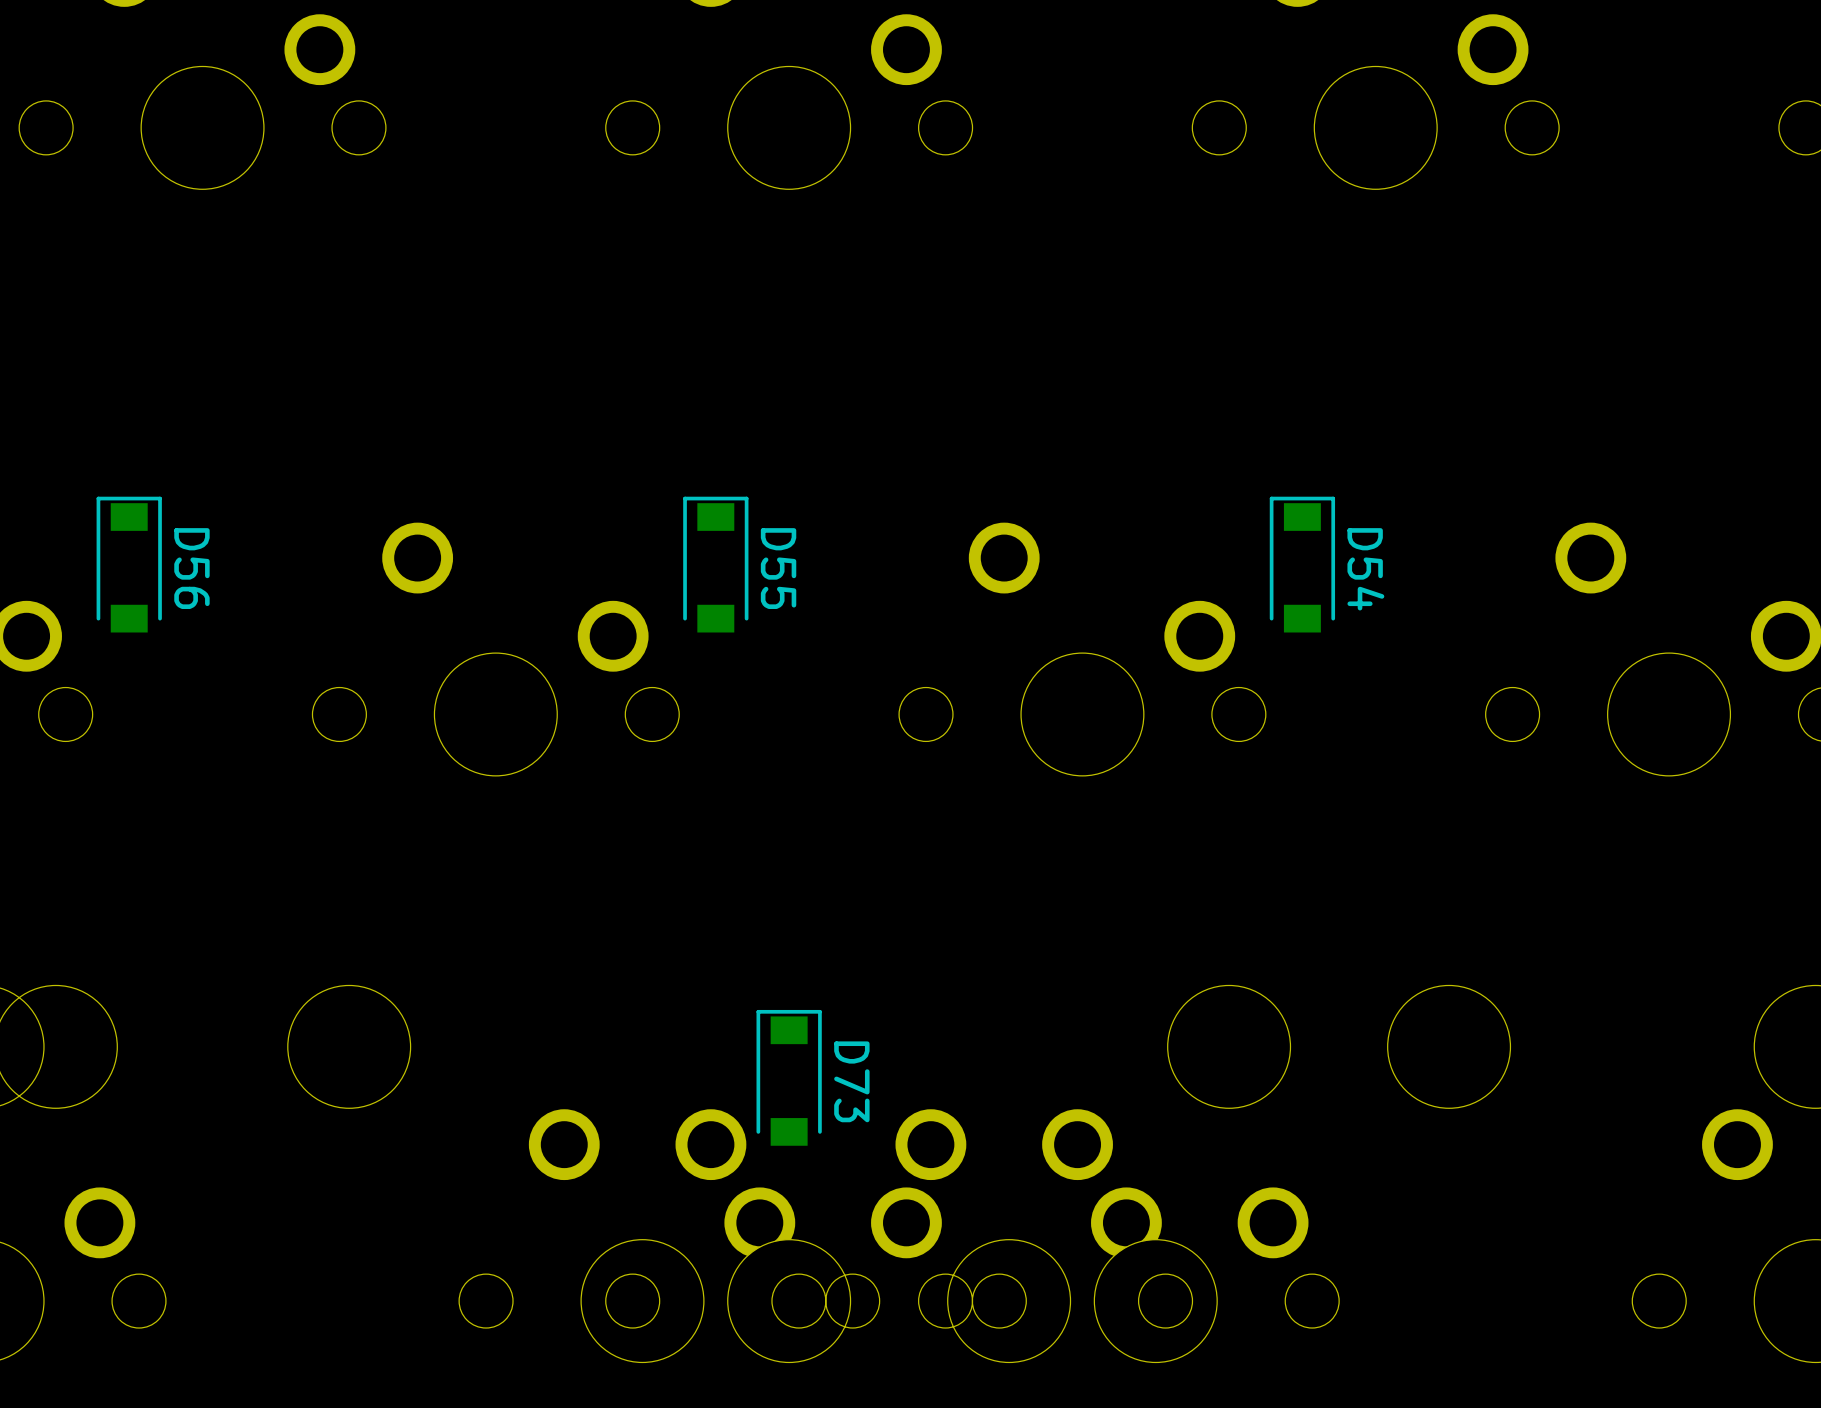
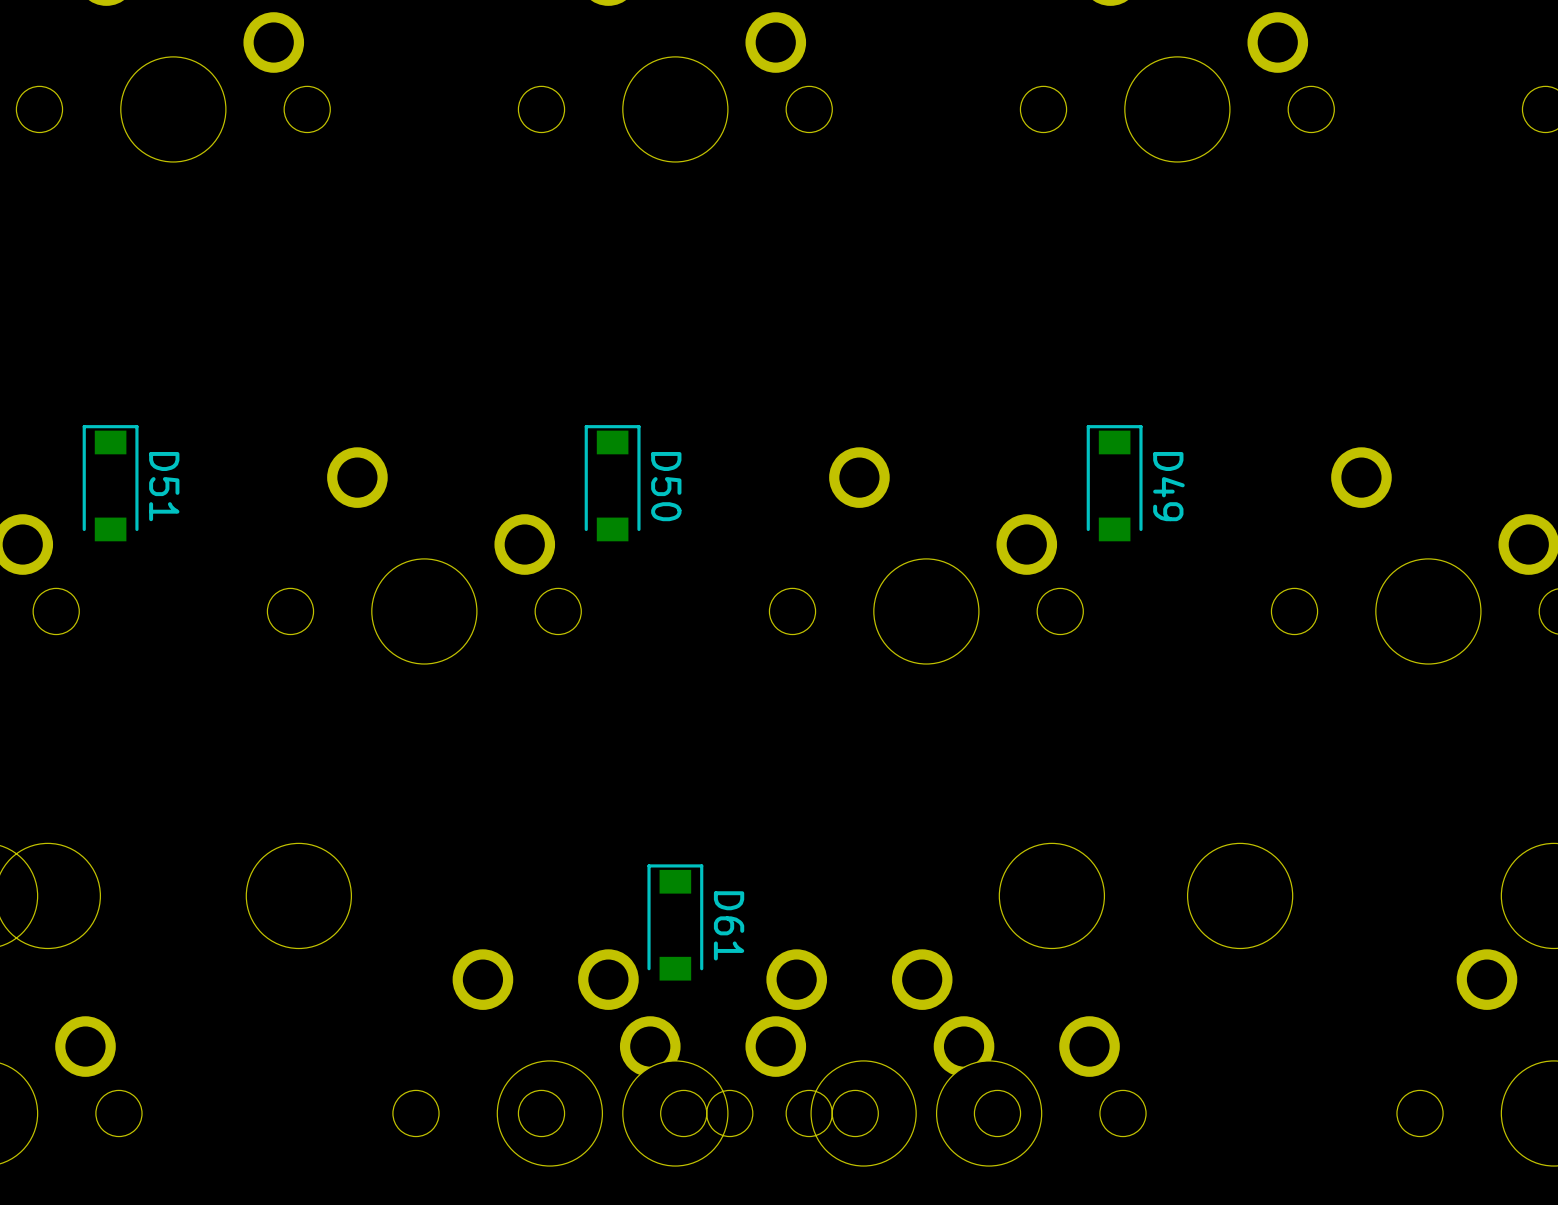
D56 name: D56 (191, 568) -> D51 (164, 486)
D55 name: D55 (778, 568) -> D50 (666, 486)
D54 name: D54 (1365, 569) -> D49 (1168, 486)
D73 name: D73 (851, 1081) -> D61 (729, 925)

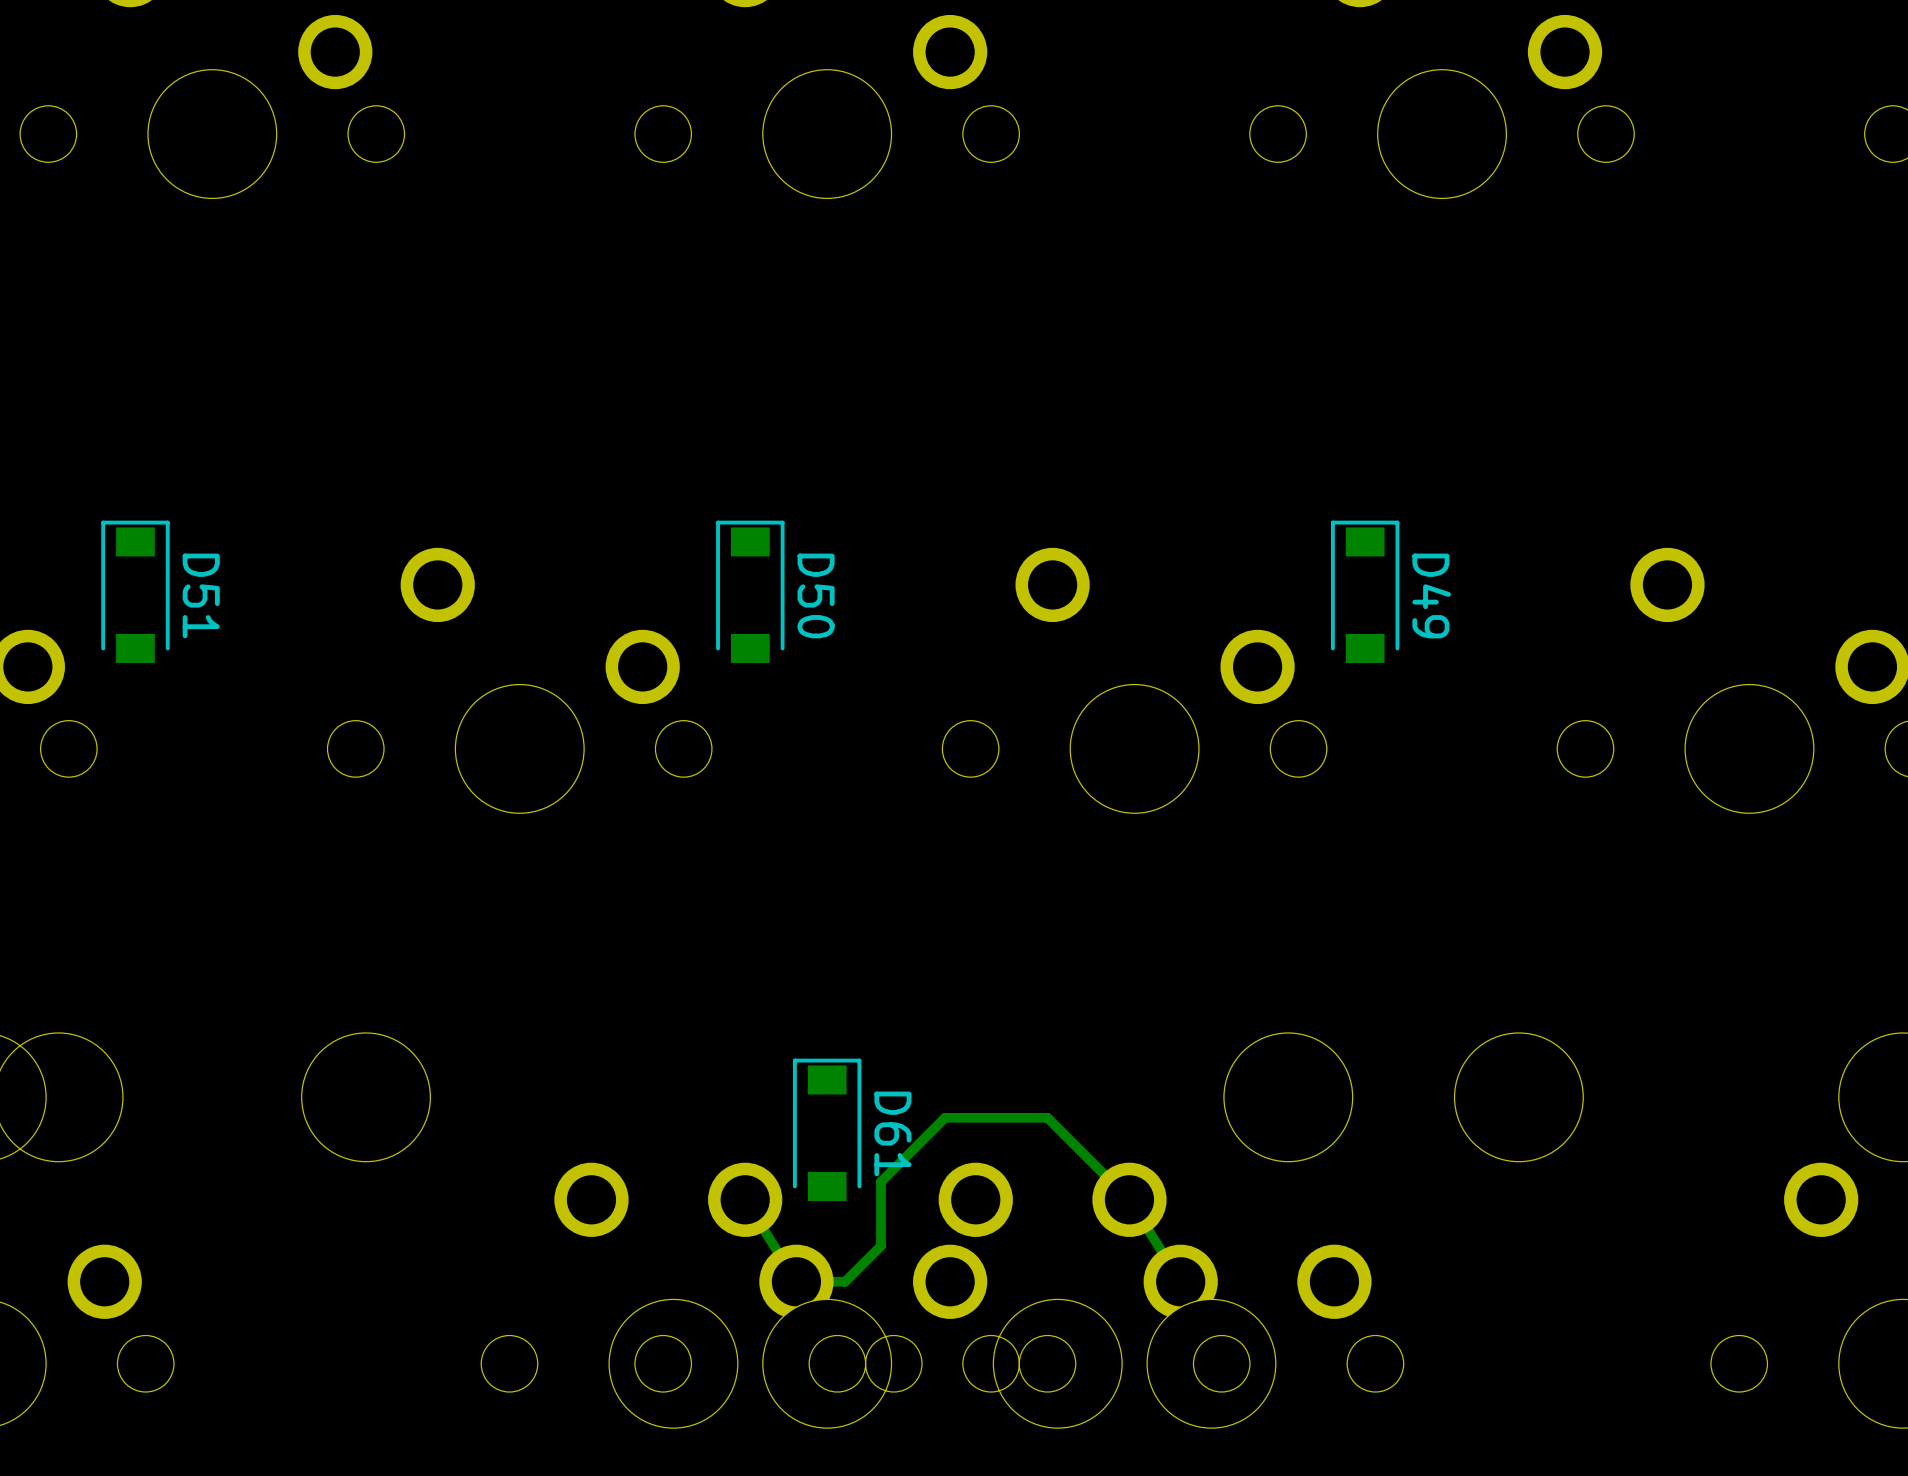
track: none -> (745, 1199) (796, 1281) (845, 1281) (880, 1245) (880, 1181) (945, 1117) (1047, 1117) (1129, 1199) (1180, 1281)

